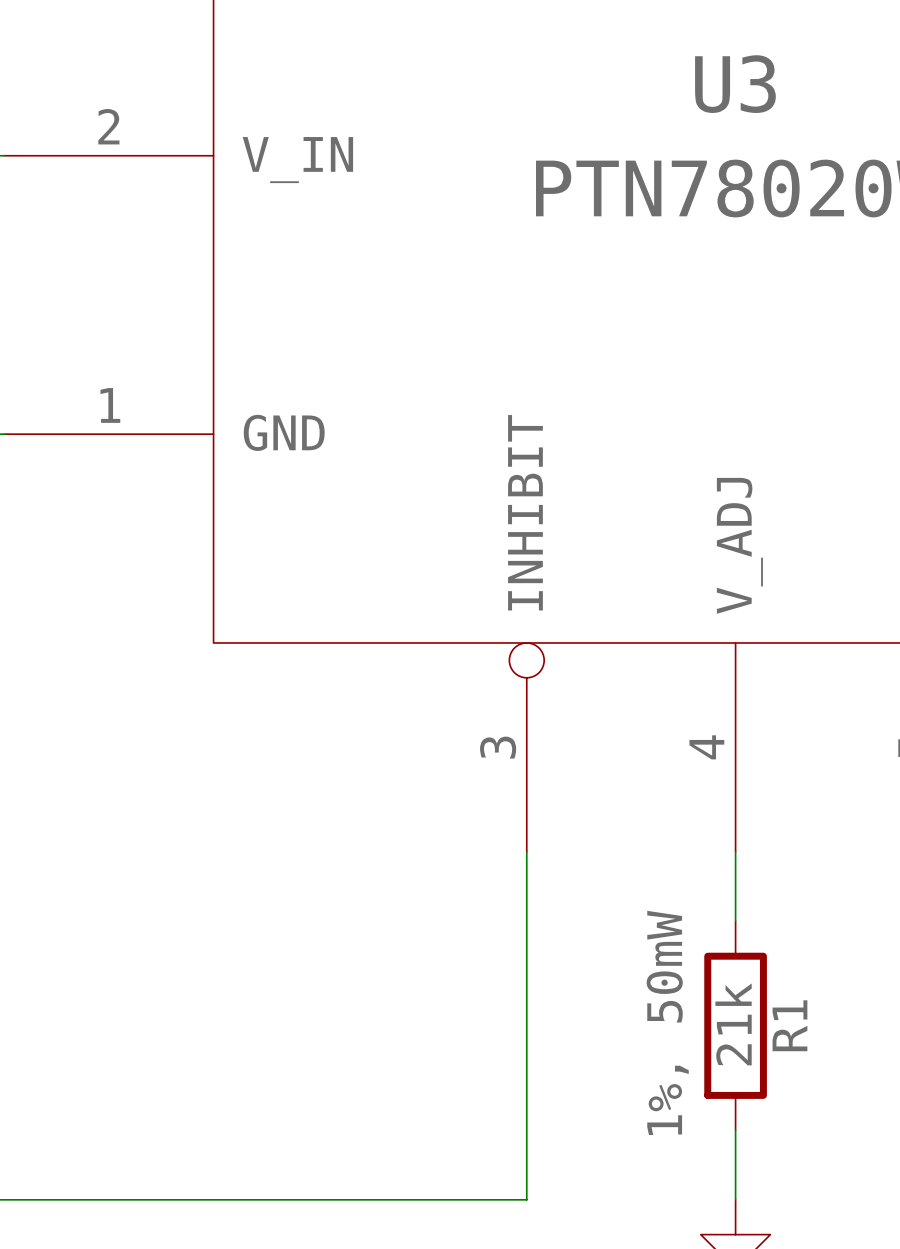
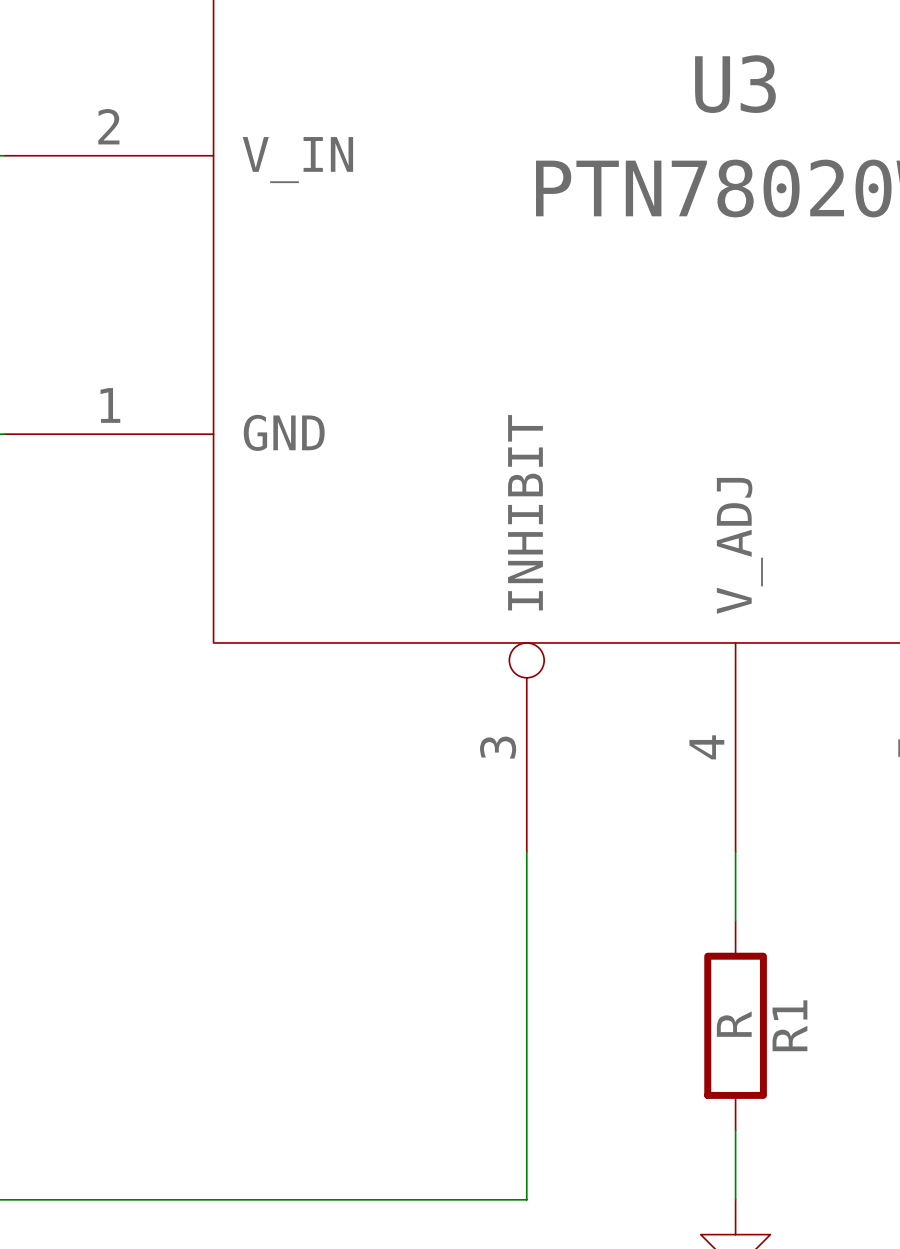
R1 text: 1%, 50mW (667, 1022) -> none
R1 value: 21k (733, 1024) -> R (734, 1024)

